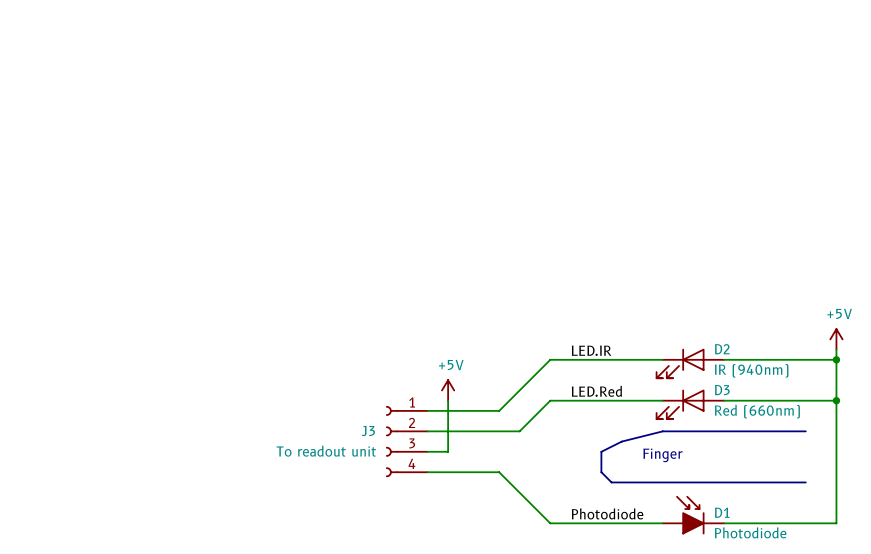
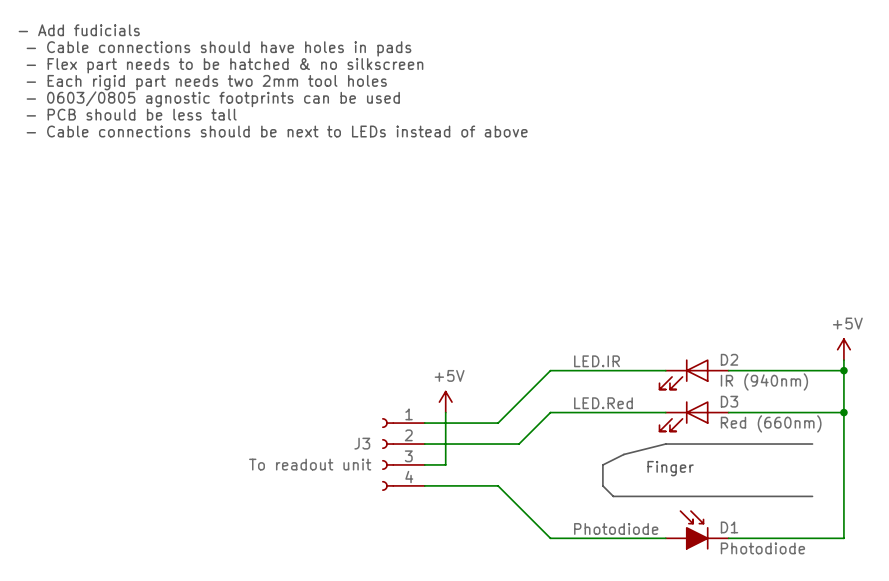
text: none -> - Add fudicials (79, 30)
text: none -> - Cable connections should have holes in pads (218, 48)
text: none -> - Flex part needs to be hatched & no silkscreen (224, 65)
text: none -> - Each rigid part needs two 2mm tool holes (206, 82)
text: none -> - 0603/0805 agnostic footprints can be used (213, 99)
text: none -> - PCB should be less tall (131, 114)
text: none -> - Cable connections should be next to LEDs instead of above (277, 131)

